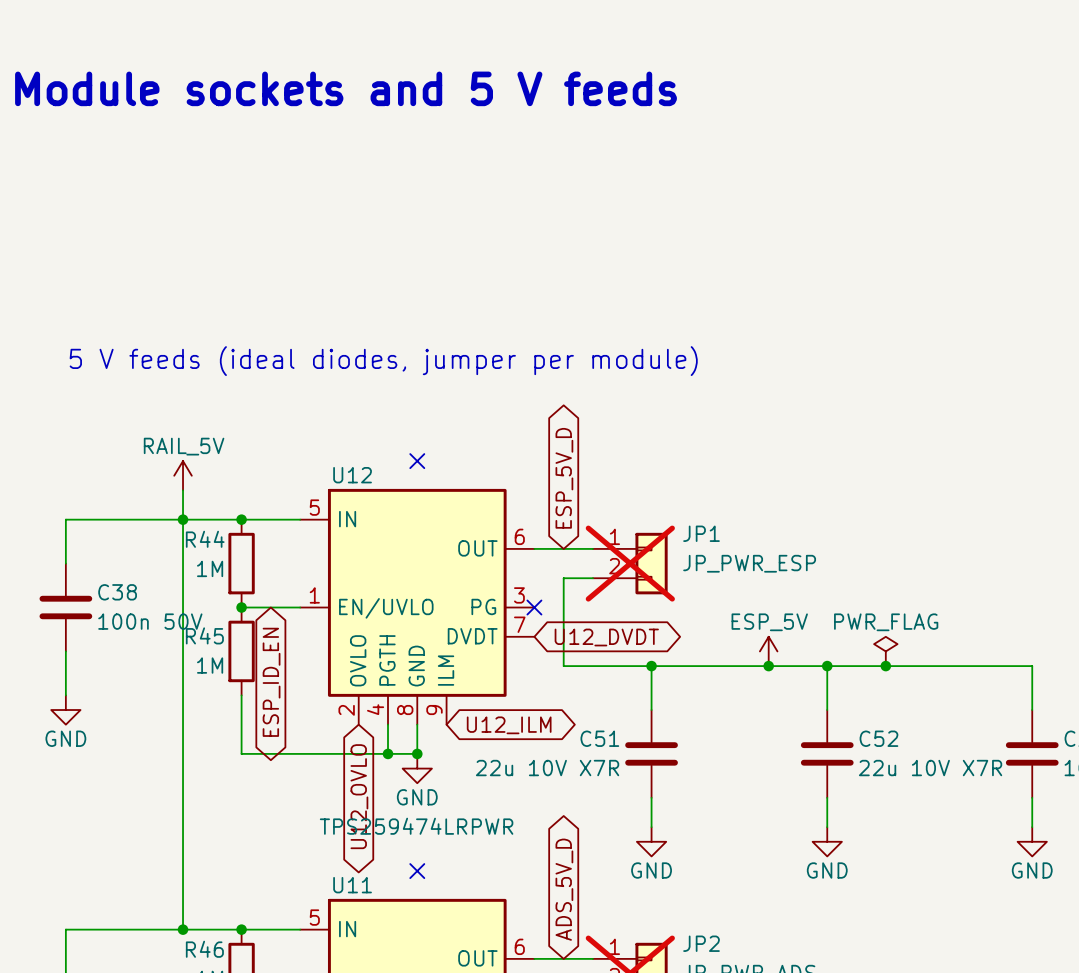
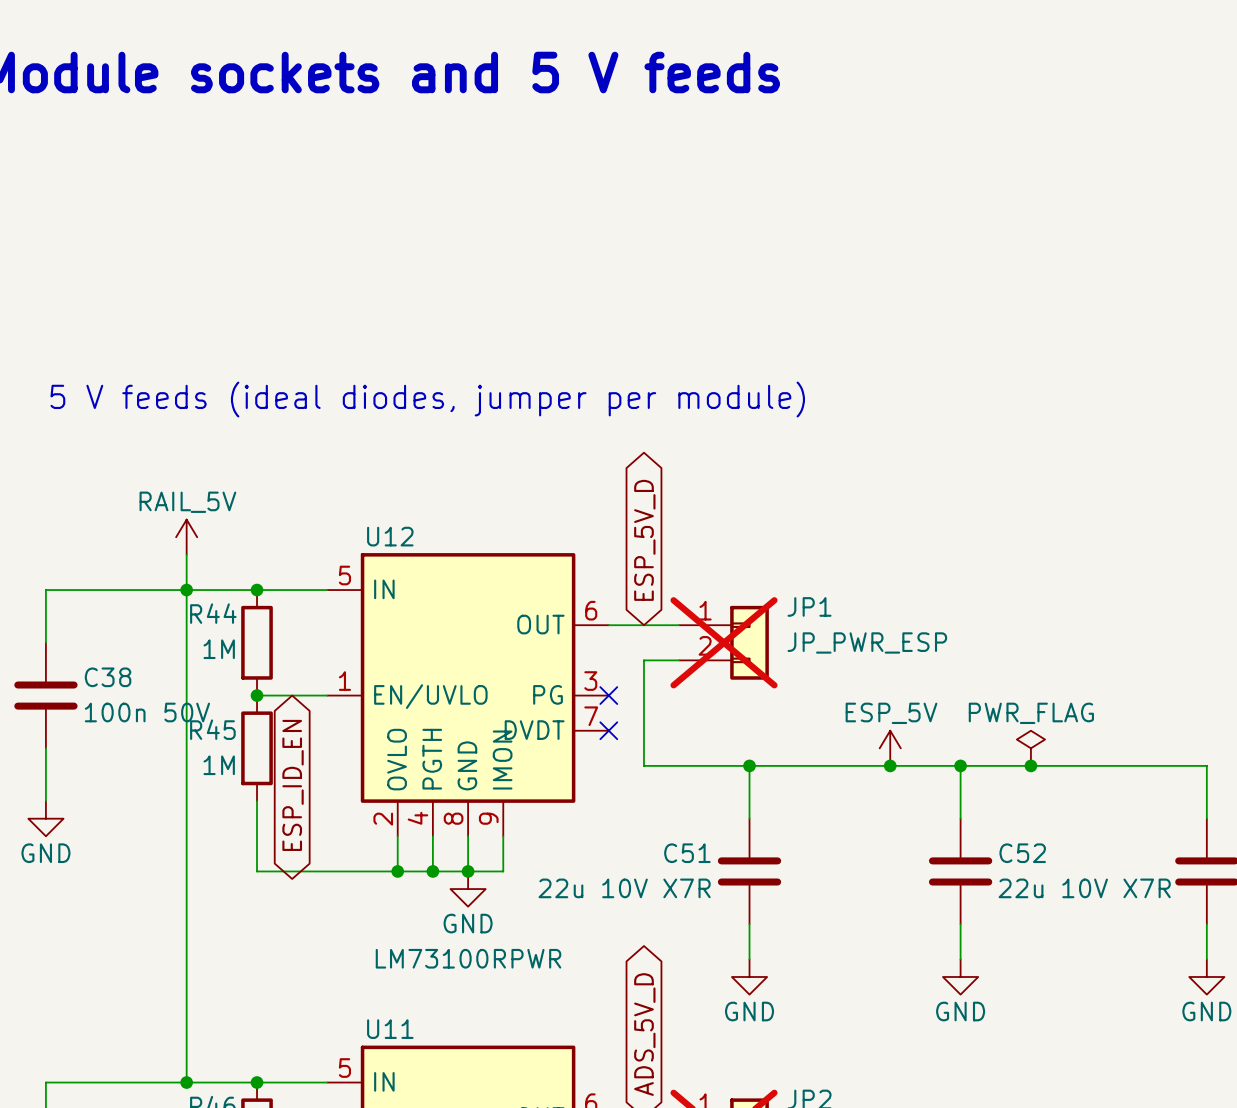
no-connect mark: (417, 461) -> none
no-connect mark: none -> (608, 730)
global label: U12_DVDT (606, 637) -> none
U12 pin name: ILM (446, 670) -> IMON (502, 760)
wire: none -> (397, 836) (397, 871)
wire: none -> (503, 836) (503, 871) (468, 871)
global label: U12_ILM (509, 725) -> none
junction: none -> (397, 871)
global label: U12_OVLO (359, 796) -> none
U12 value: TPS259474LRPWR (416, 826) -> LM73100RPWR (468, 958)
no-connect mark: (417, 871) -> none

